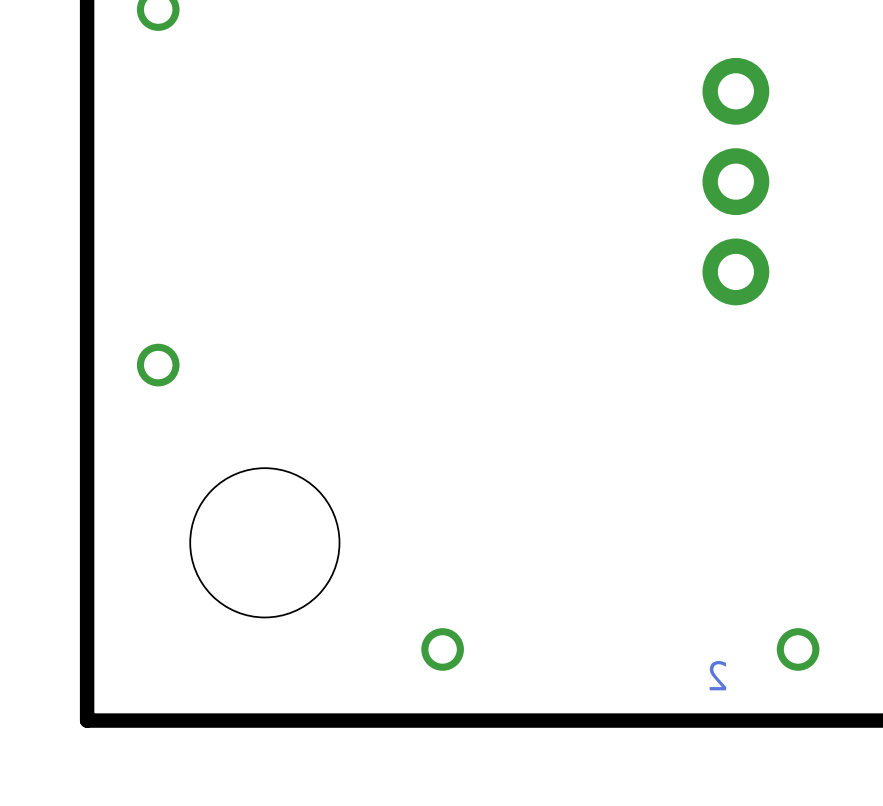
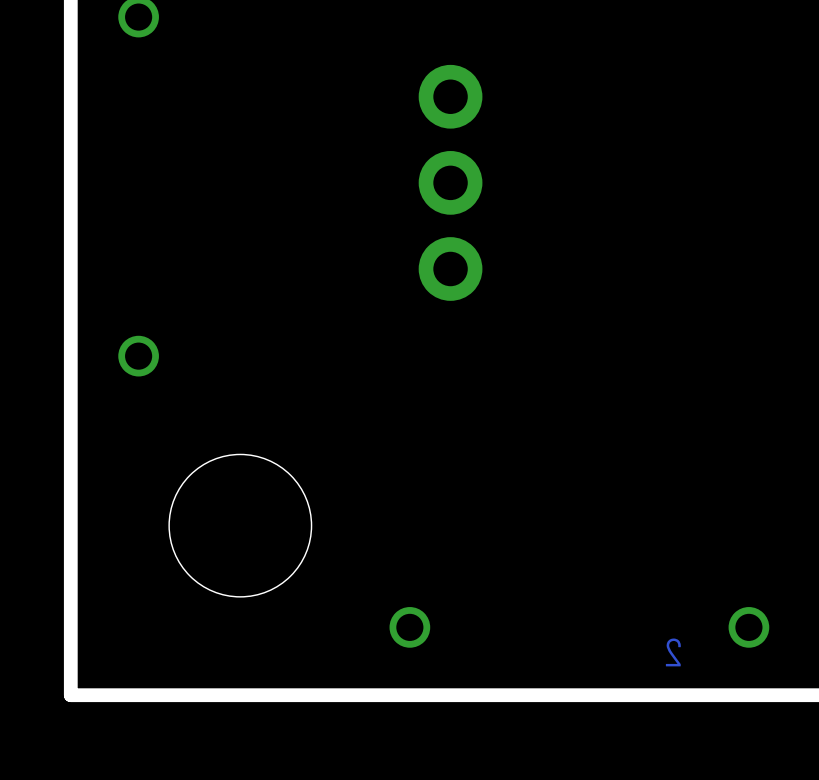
part position: (735, 181) -> (450, 182)

